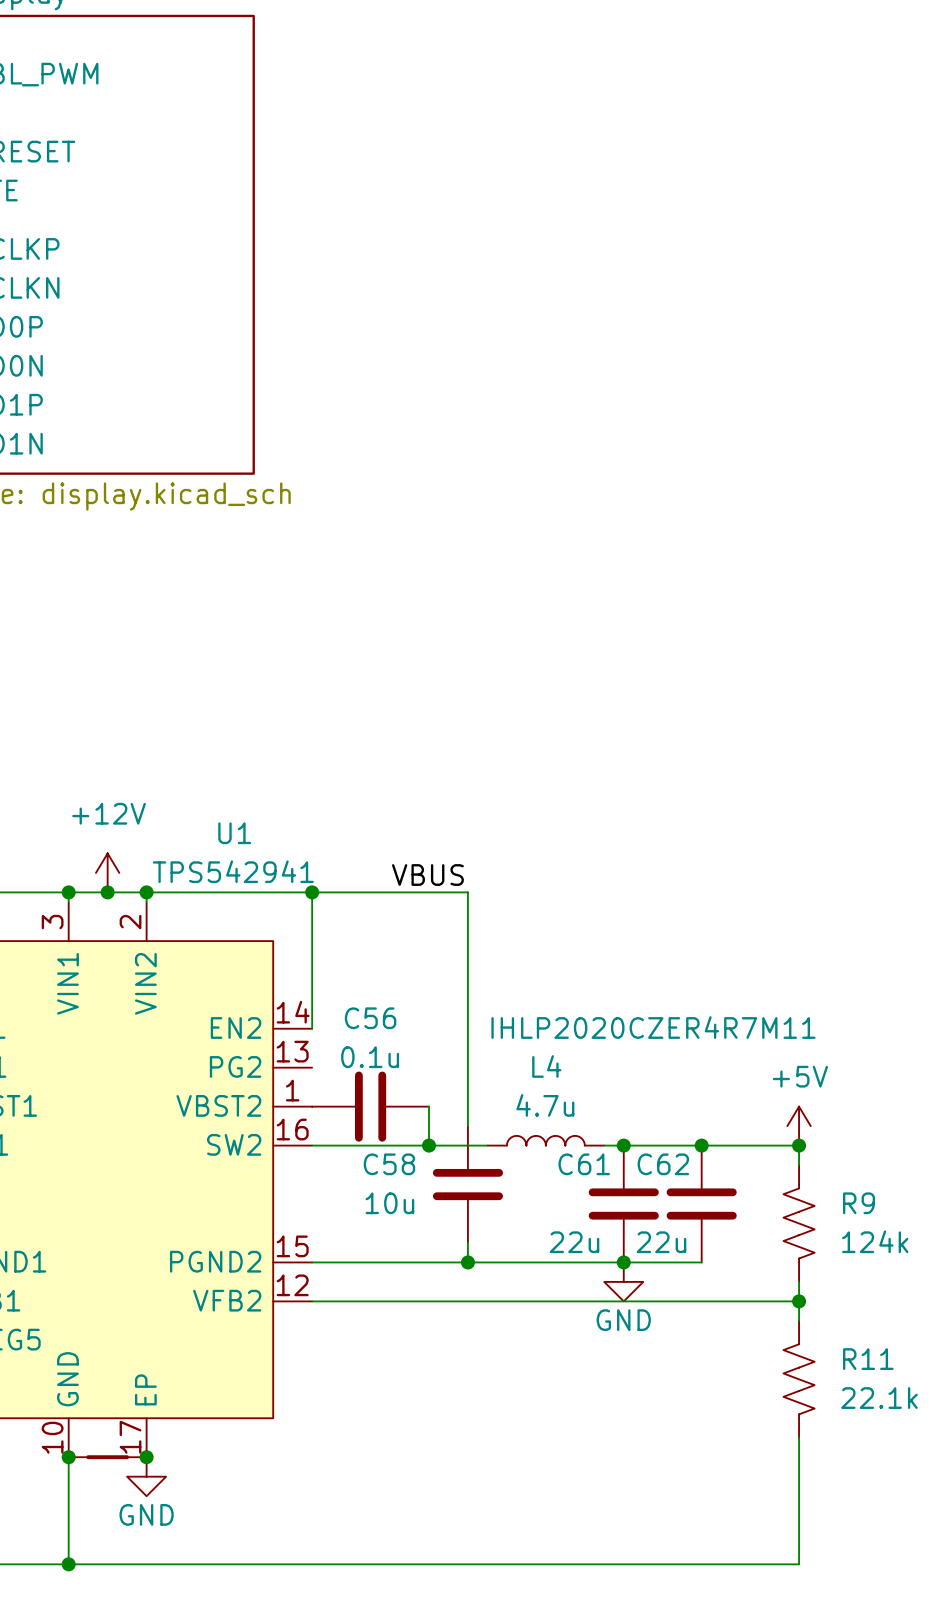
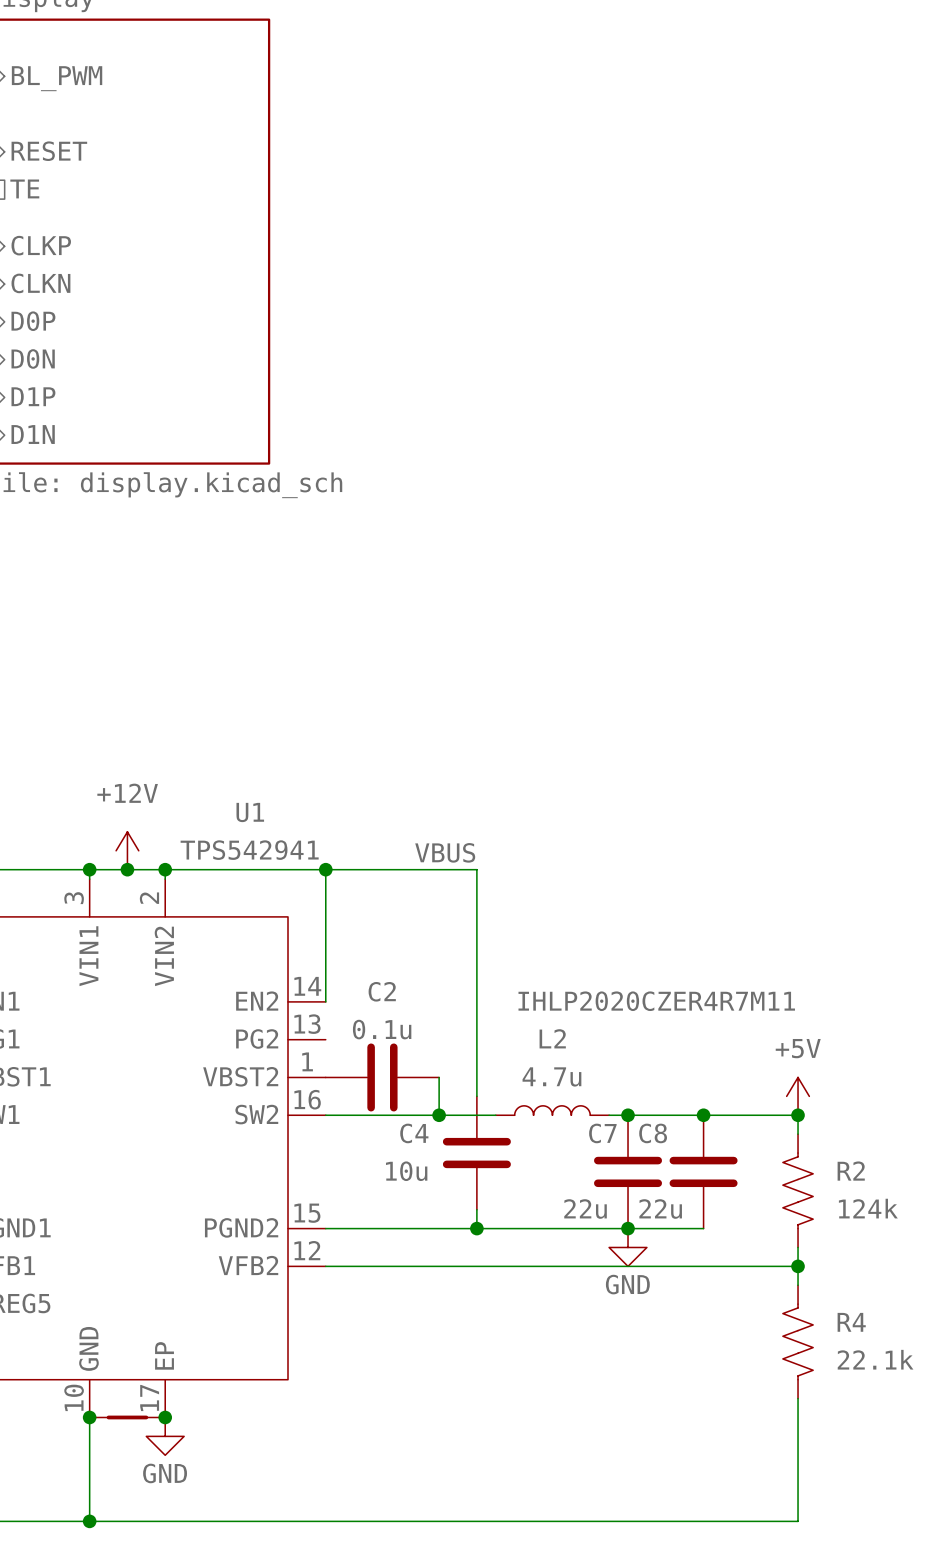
C56 name: C56 (370, 1018) -> C2 (382, 991)
L4 name: L4 (546, 1066) -> L2 (552, 1038)
C58 name: C58 (389, 1164) -> C4 (414, 1133)
C61 name: C61 (584, 1164) -> C7 (602, 1133)
C62 name: C62 (663, 1164) -> C8 (653, 1133)
R9 name: R9 (859, 1203) -> R2 (851, 1171)
R11 name: R11 (868, 1359) -> R4 (851, 1322)

